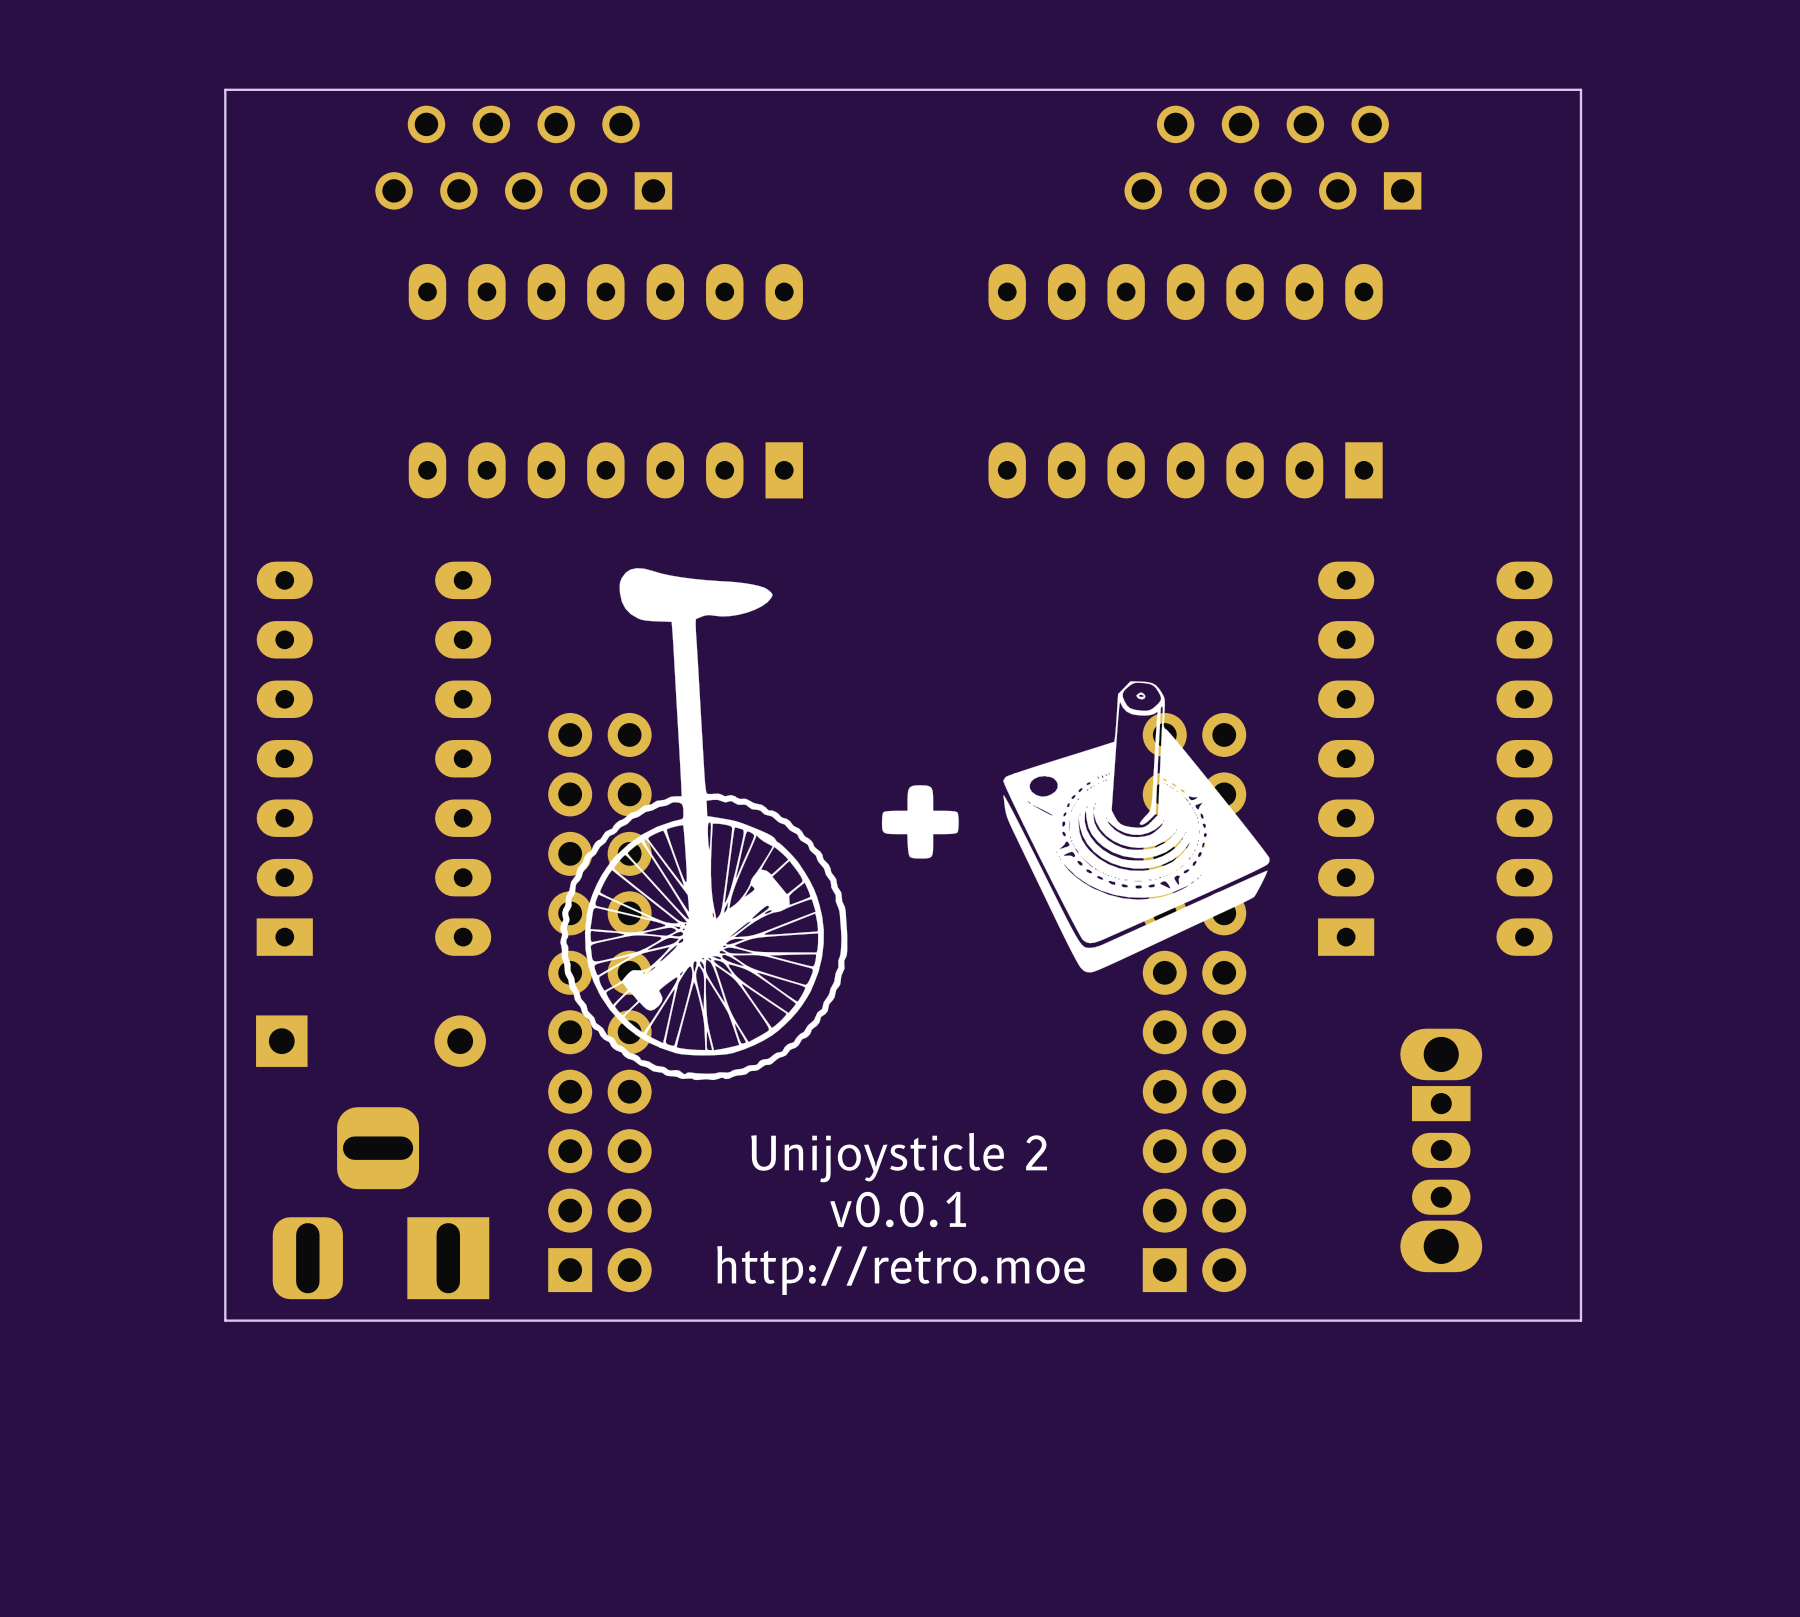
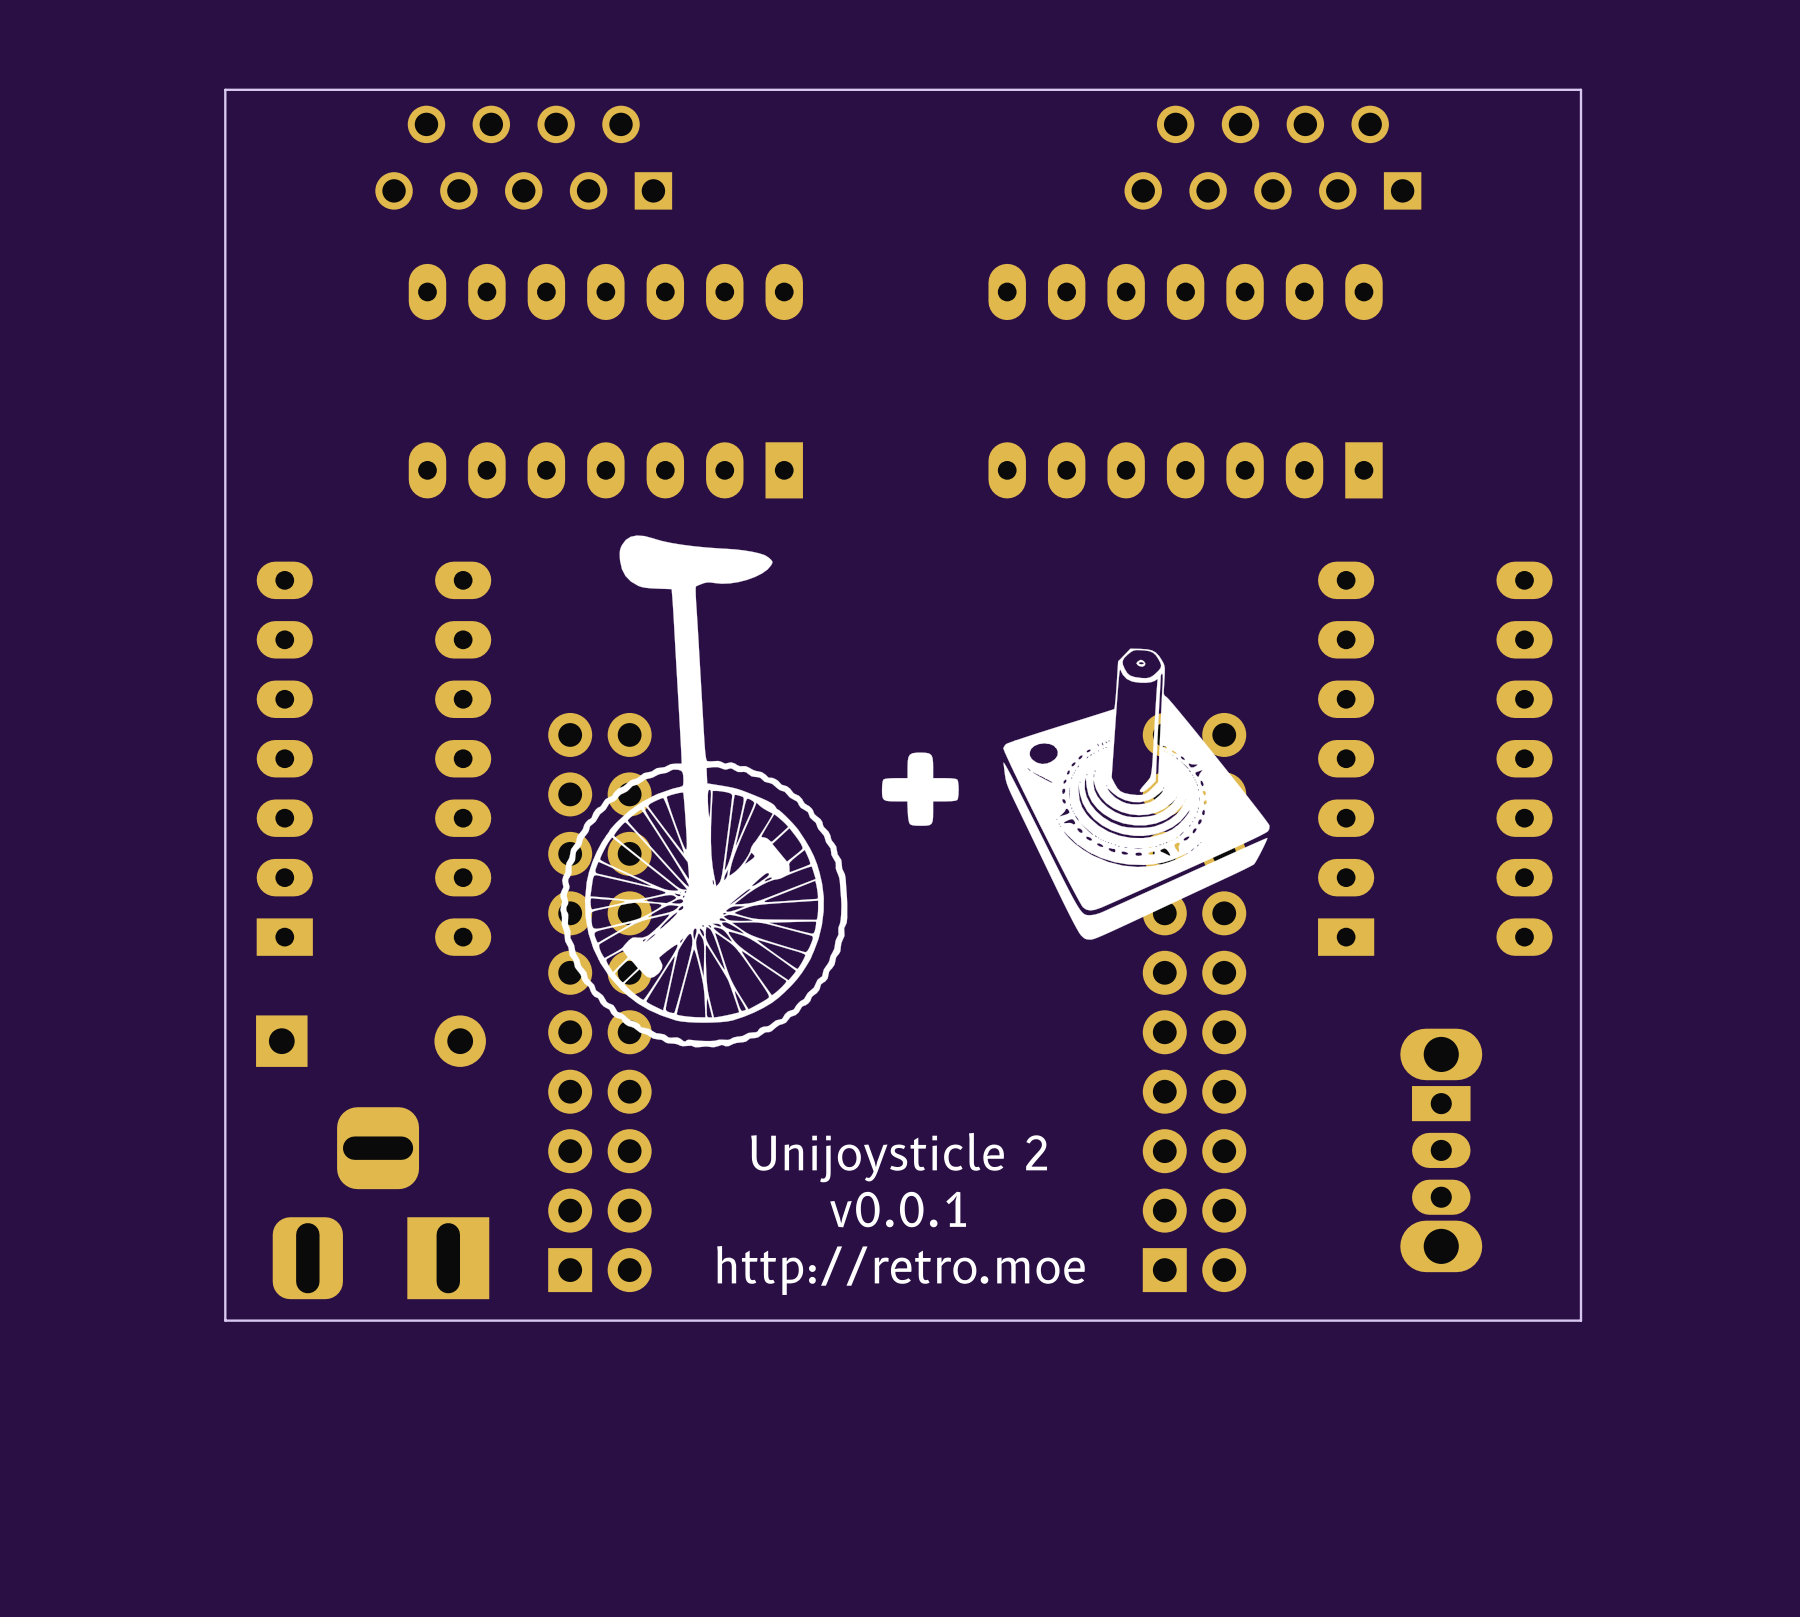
drawing position: (914, 824) -> (914, 791)

